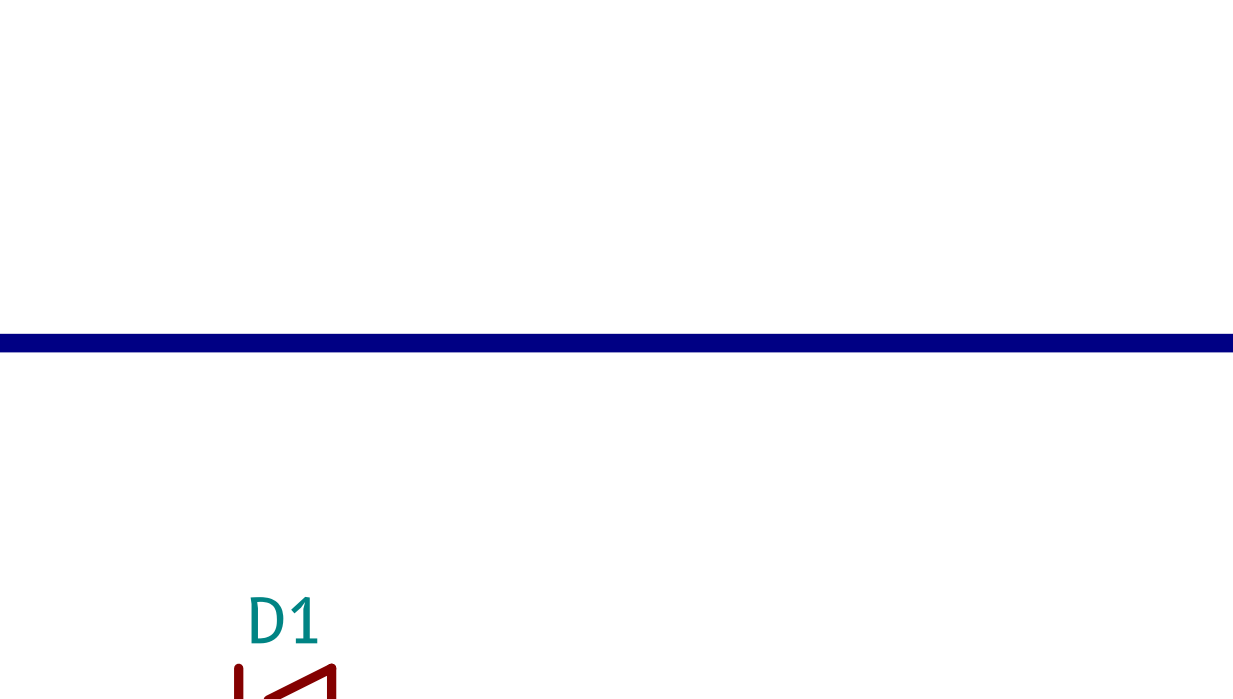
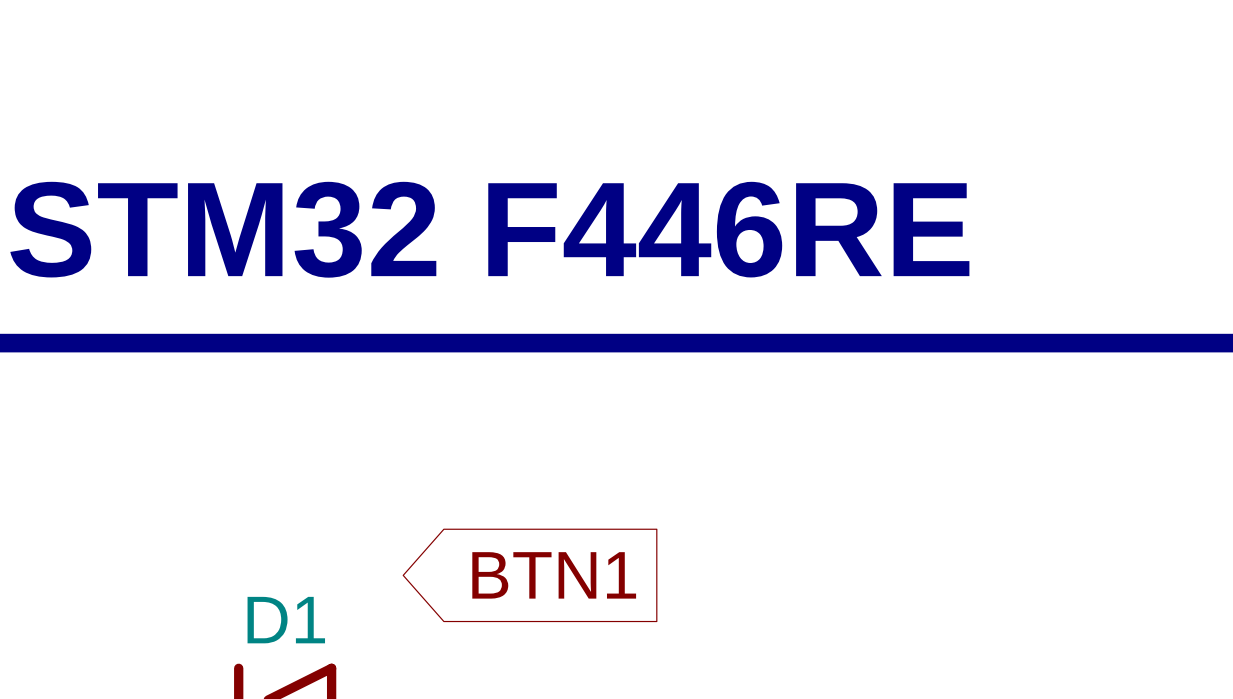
text: none -> STM32 F446RE (489, 229)
global label: none -> BTN1 (554, 575)

